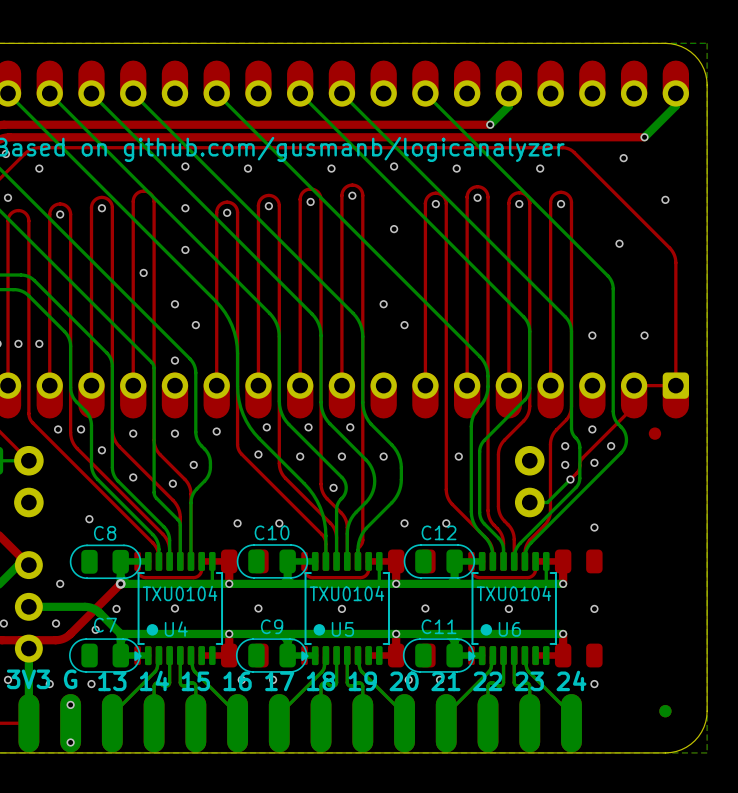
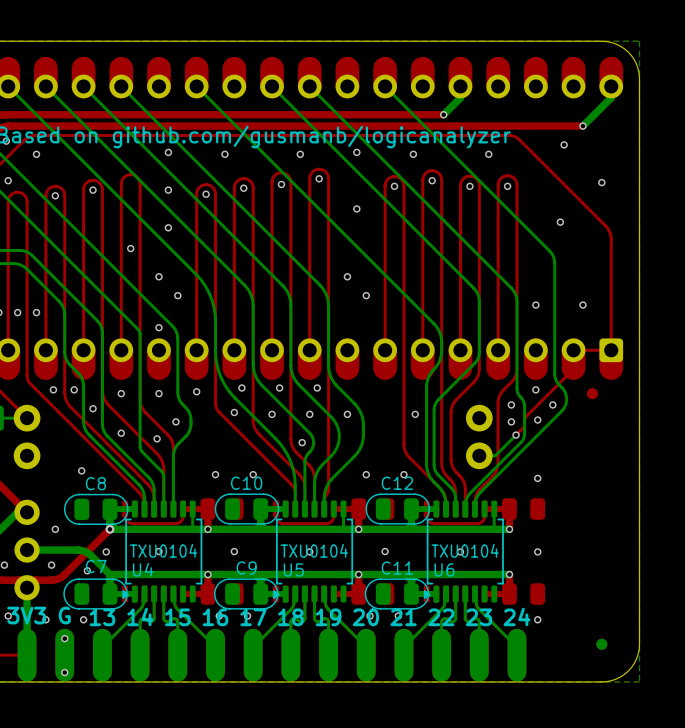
U4 footprint: [134, 551, 224, 666] -> [122, 500, 203, 603]
U5 footprint: [301, 551, 390, 666] -> [273, 500, 354, 603]
U6 footprint: [468, 551, 557, 666] -> [423, 500, 504, 603]

